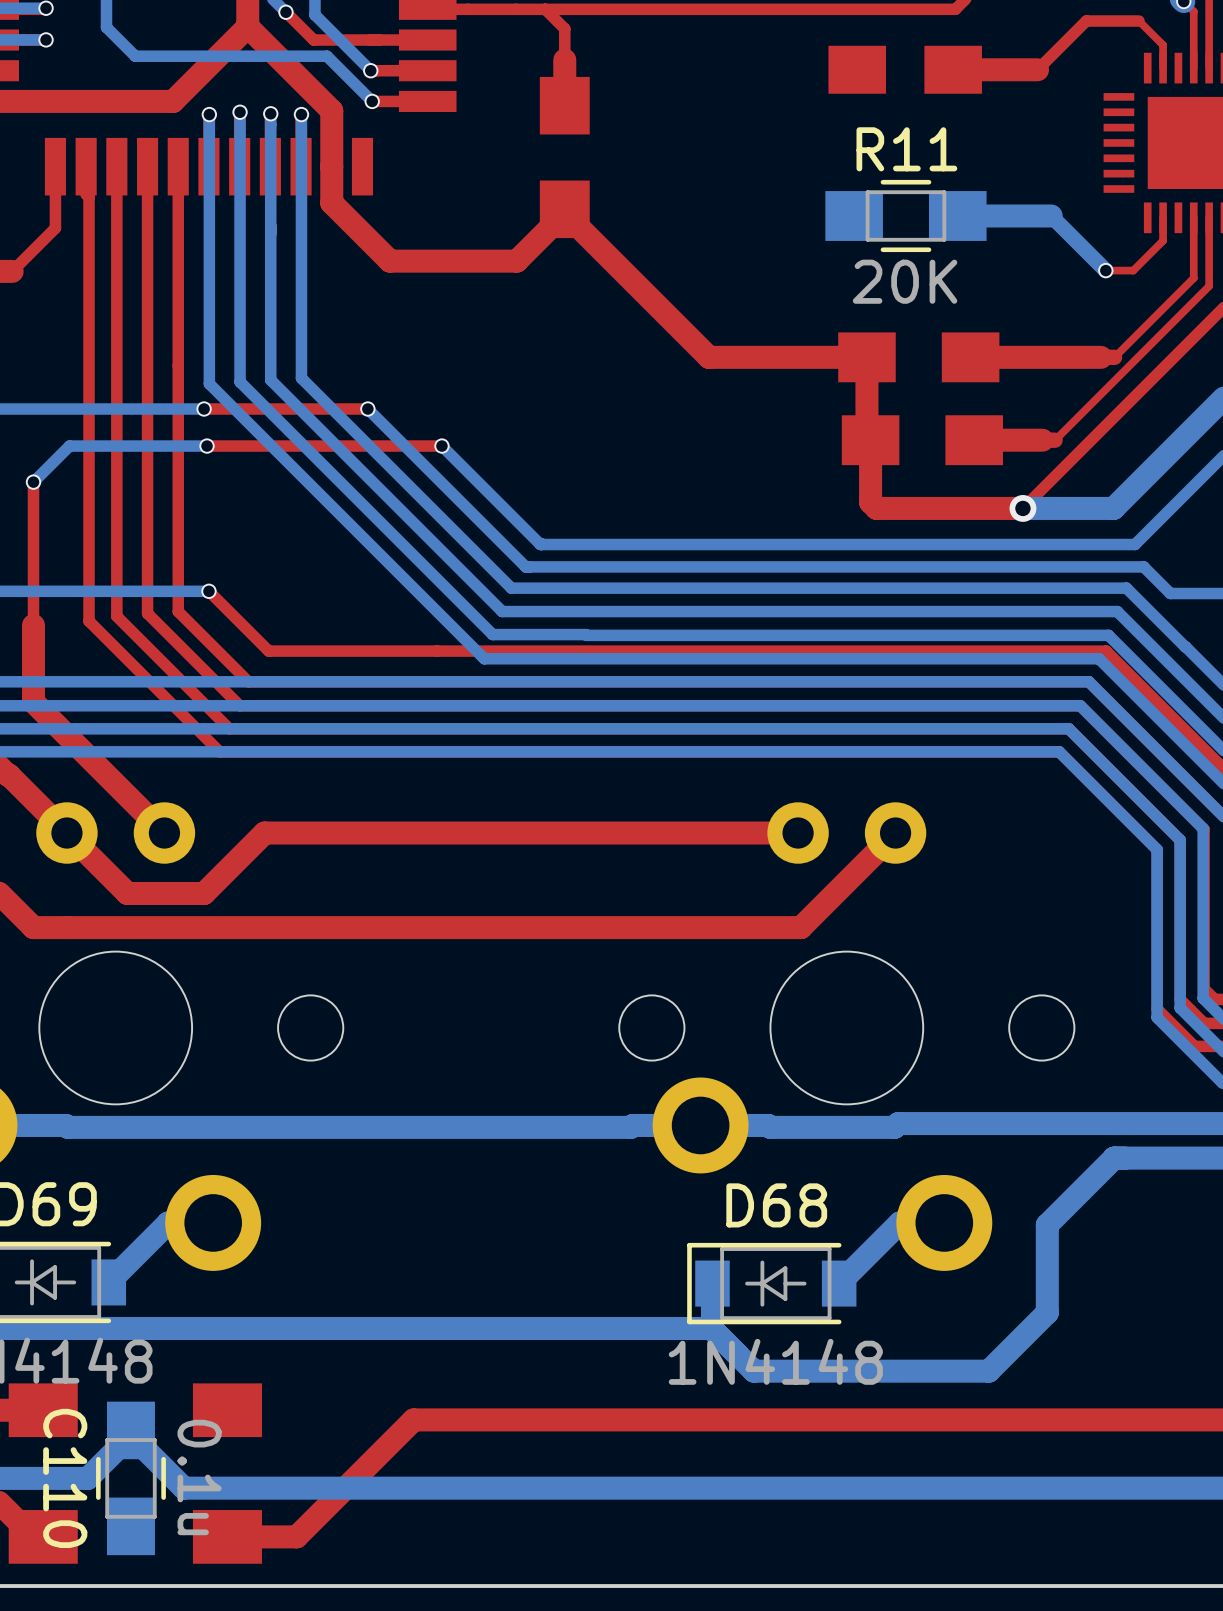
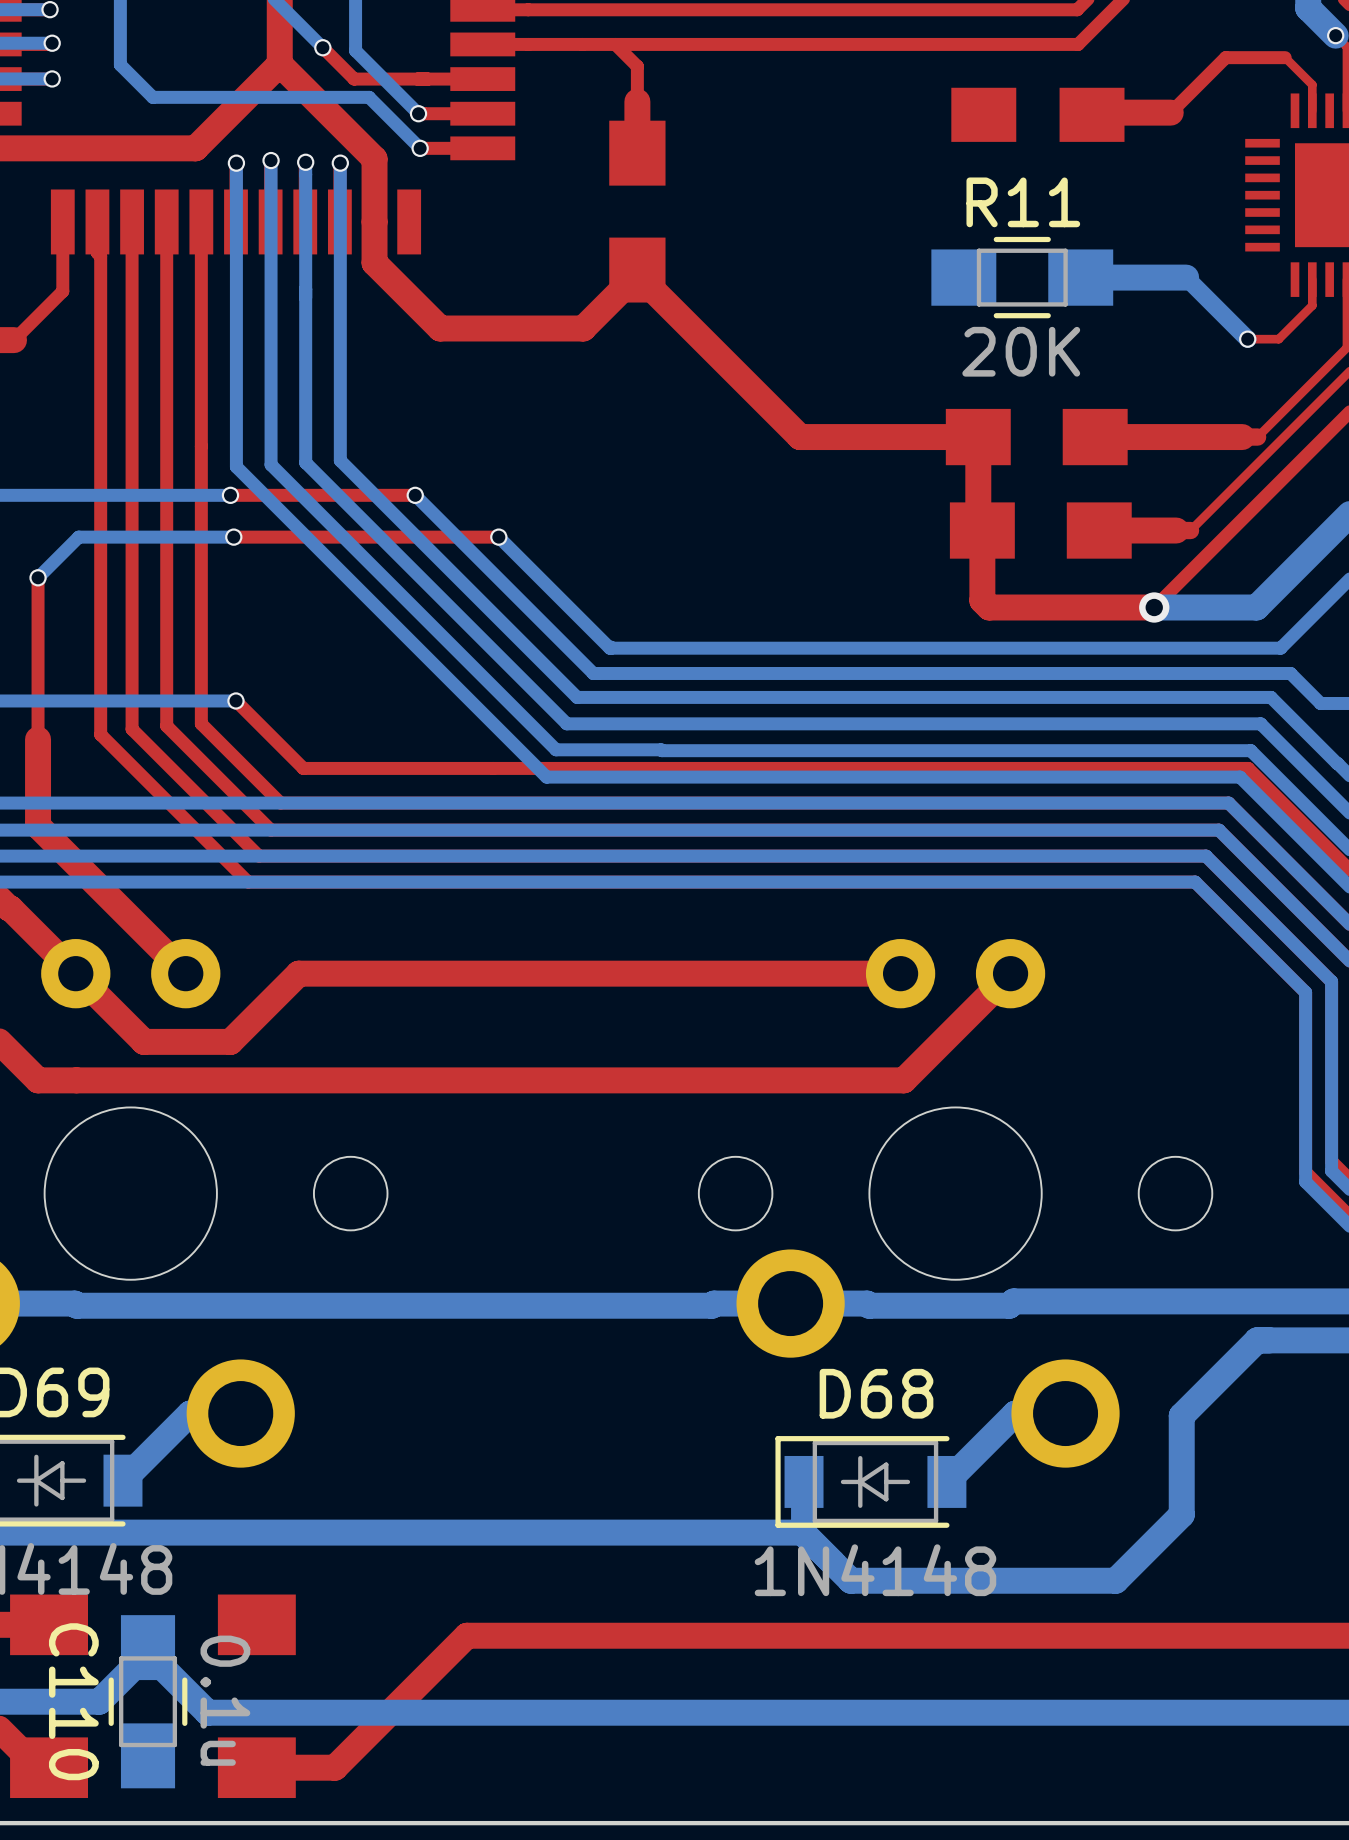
part position: (905, 69) -> (1037, 114)

